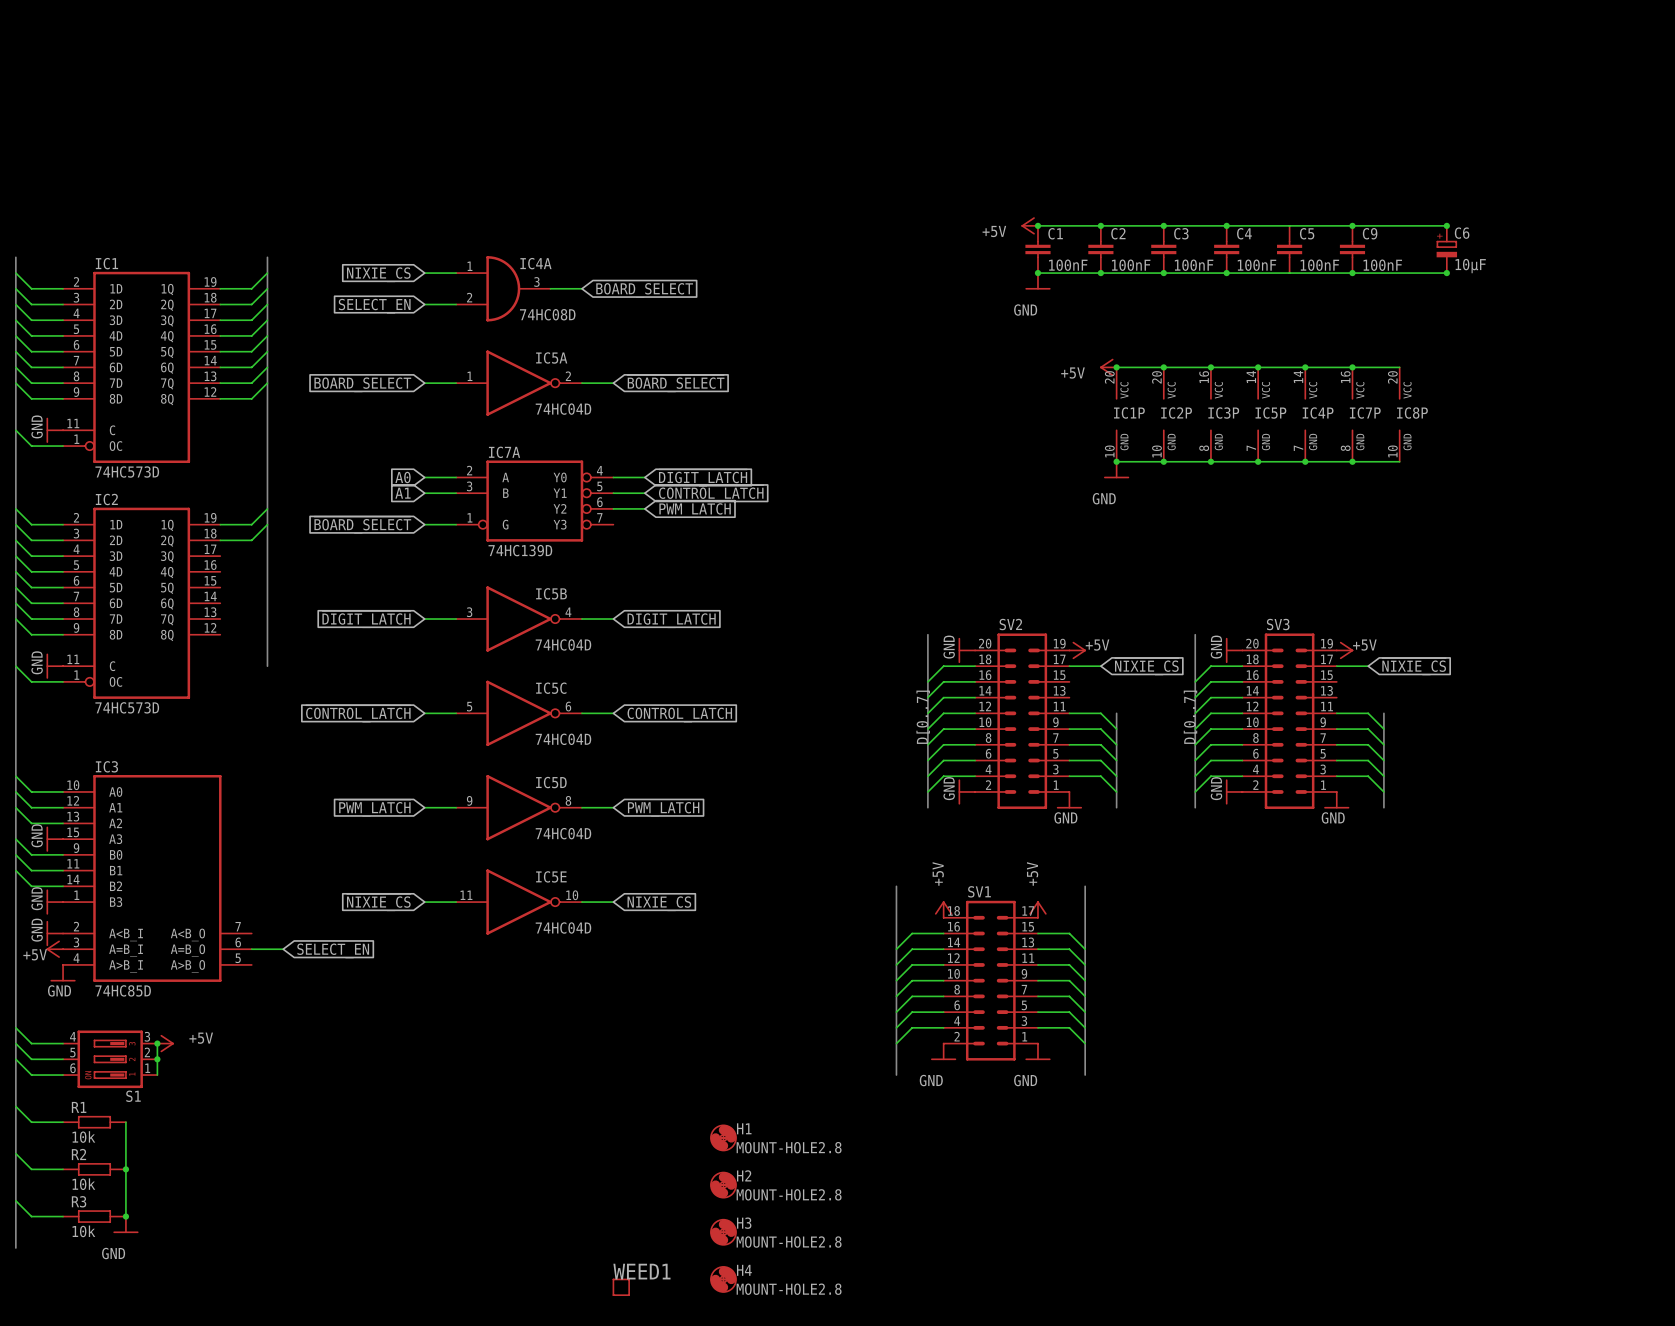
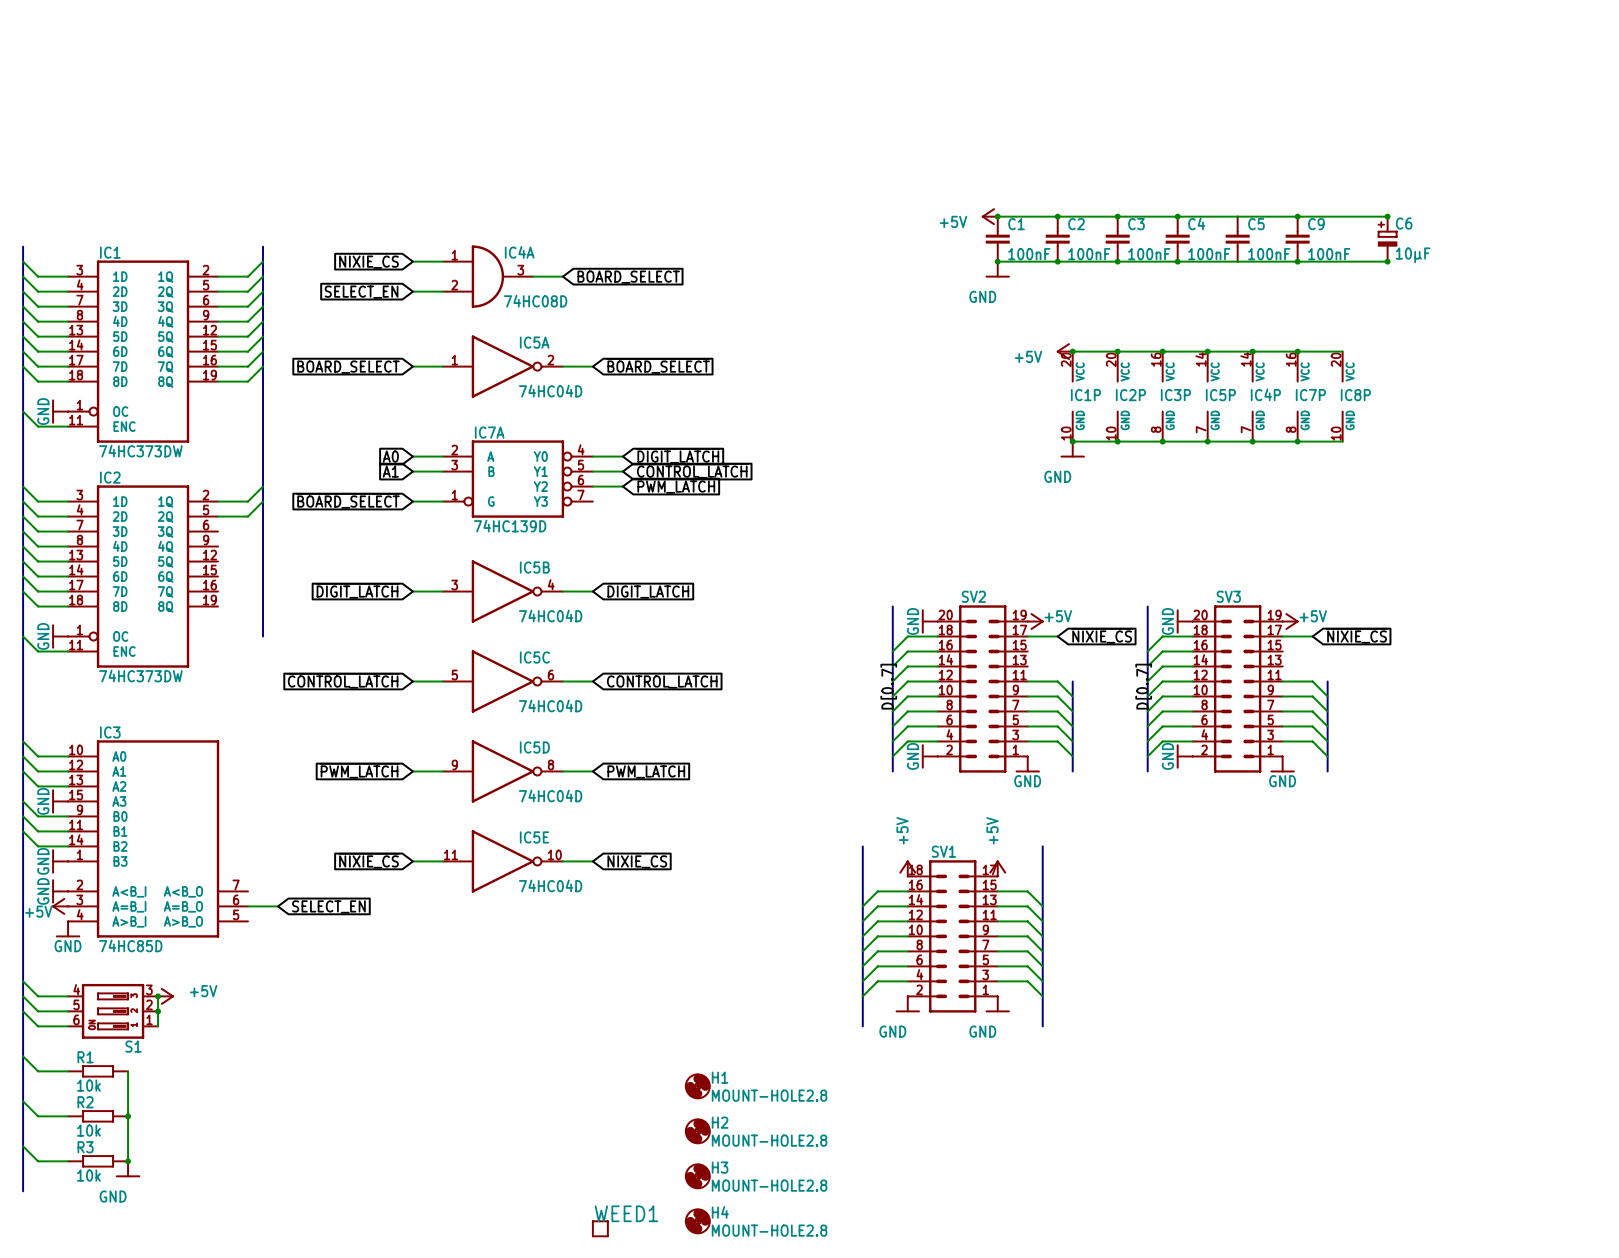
IC1 symbol: [63, 271, 221, 464] -> [68, 260, 219, 443]
IC1 value: 74HC573D (127, 471) -> 74HC373DW (140, 451)
IC2 symbol: [63, 507, 221, 699] -> [68, 485, 219, 668]
IC2 value: 74HC573D (127, 707) -> 74HC373DW (140, 675)

